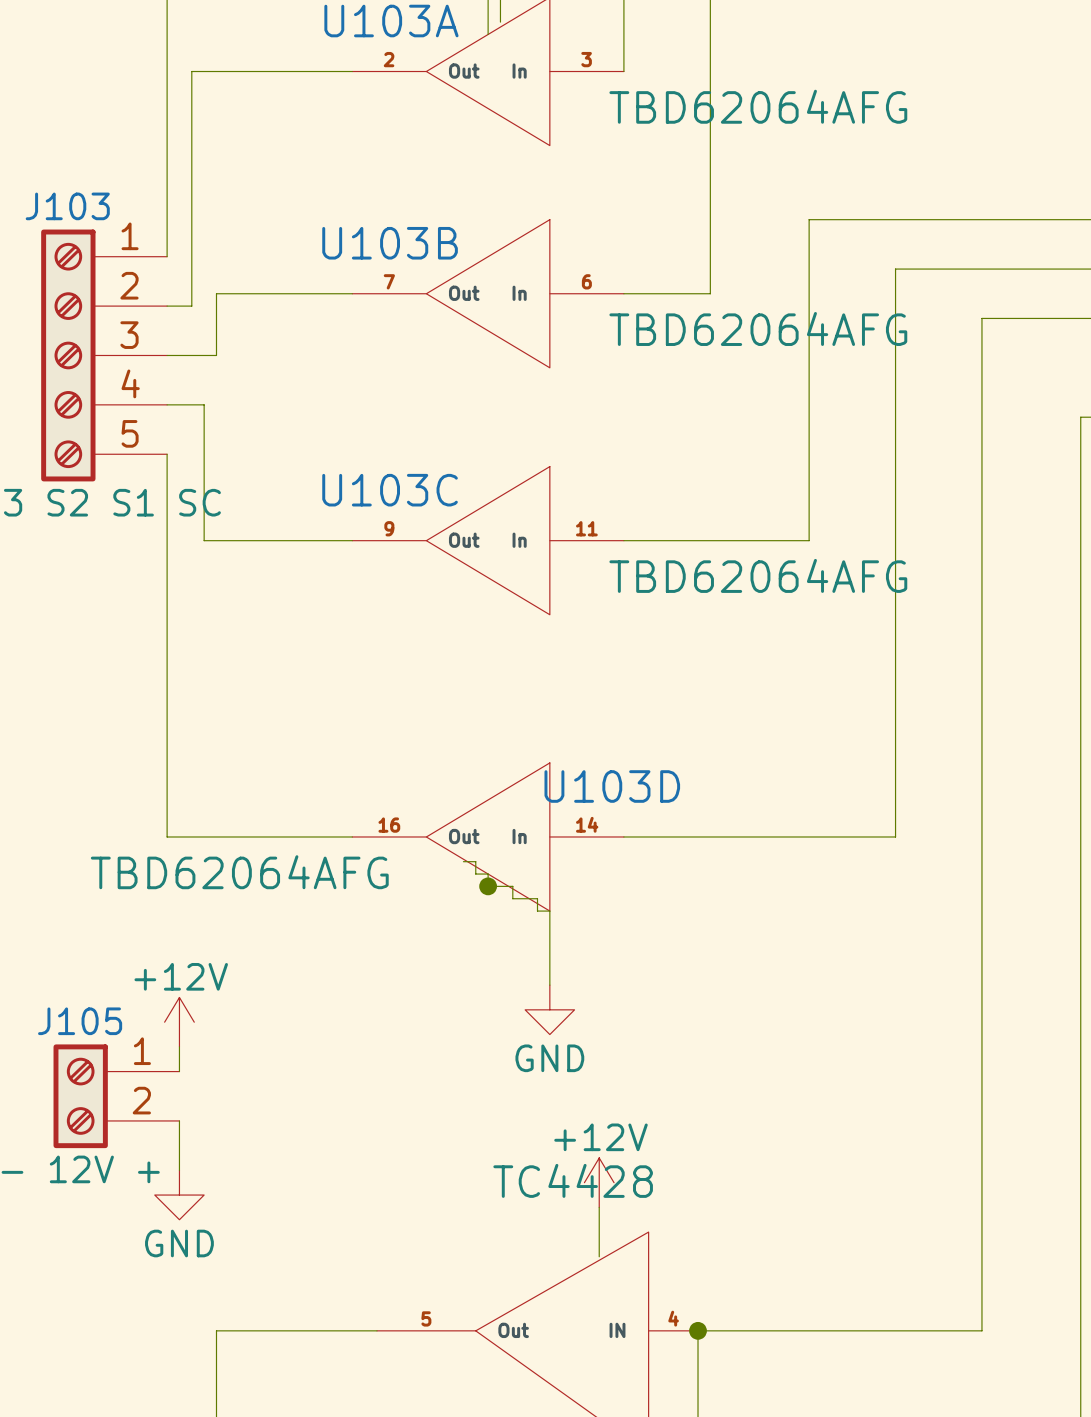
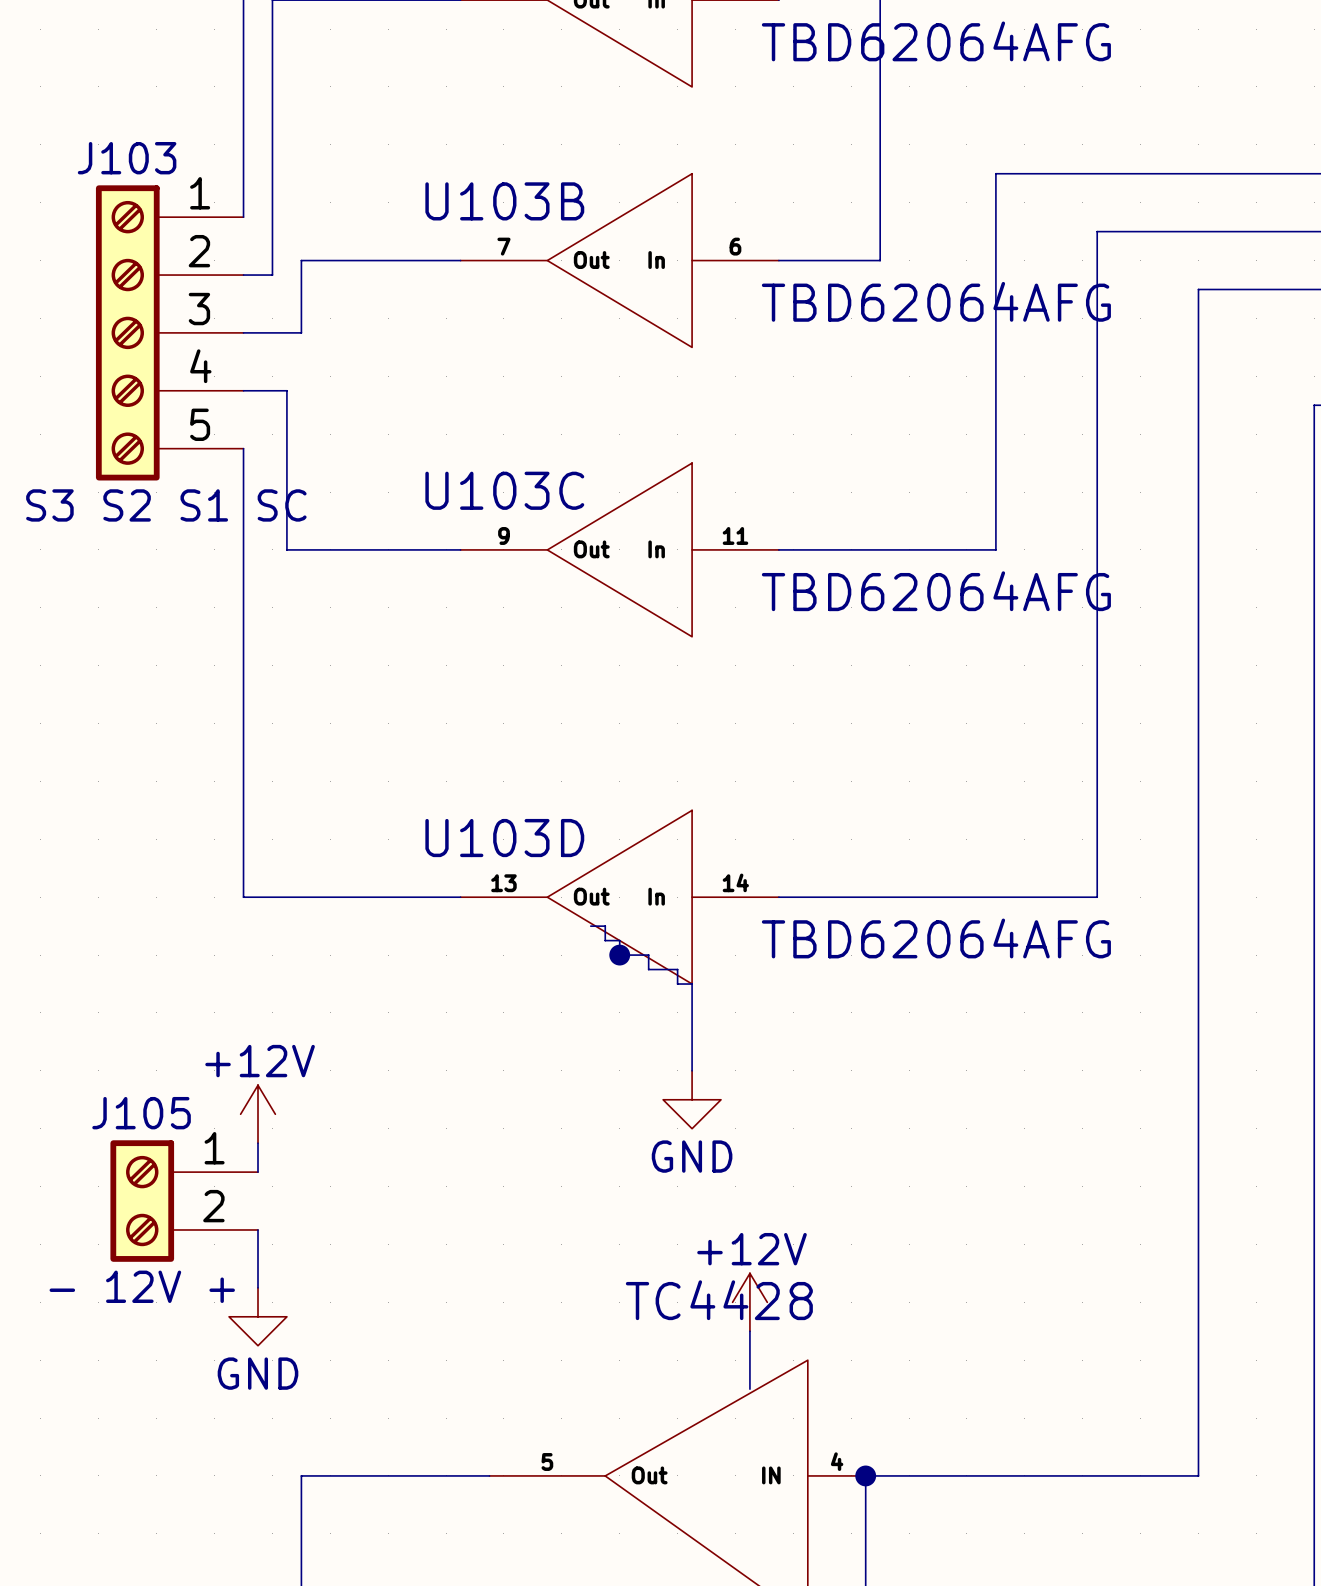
U103D name position: U103D (612, 786) -> U103D (504, 838)
U103D pin number: 16 (389, 825) -> 13 (503, 883)
U103D value position: TBD62064AFG (239, 872) -> TBD62064AFG (936, 938)

